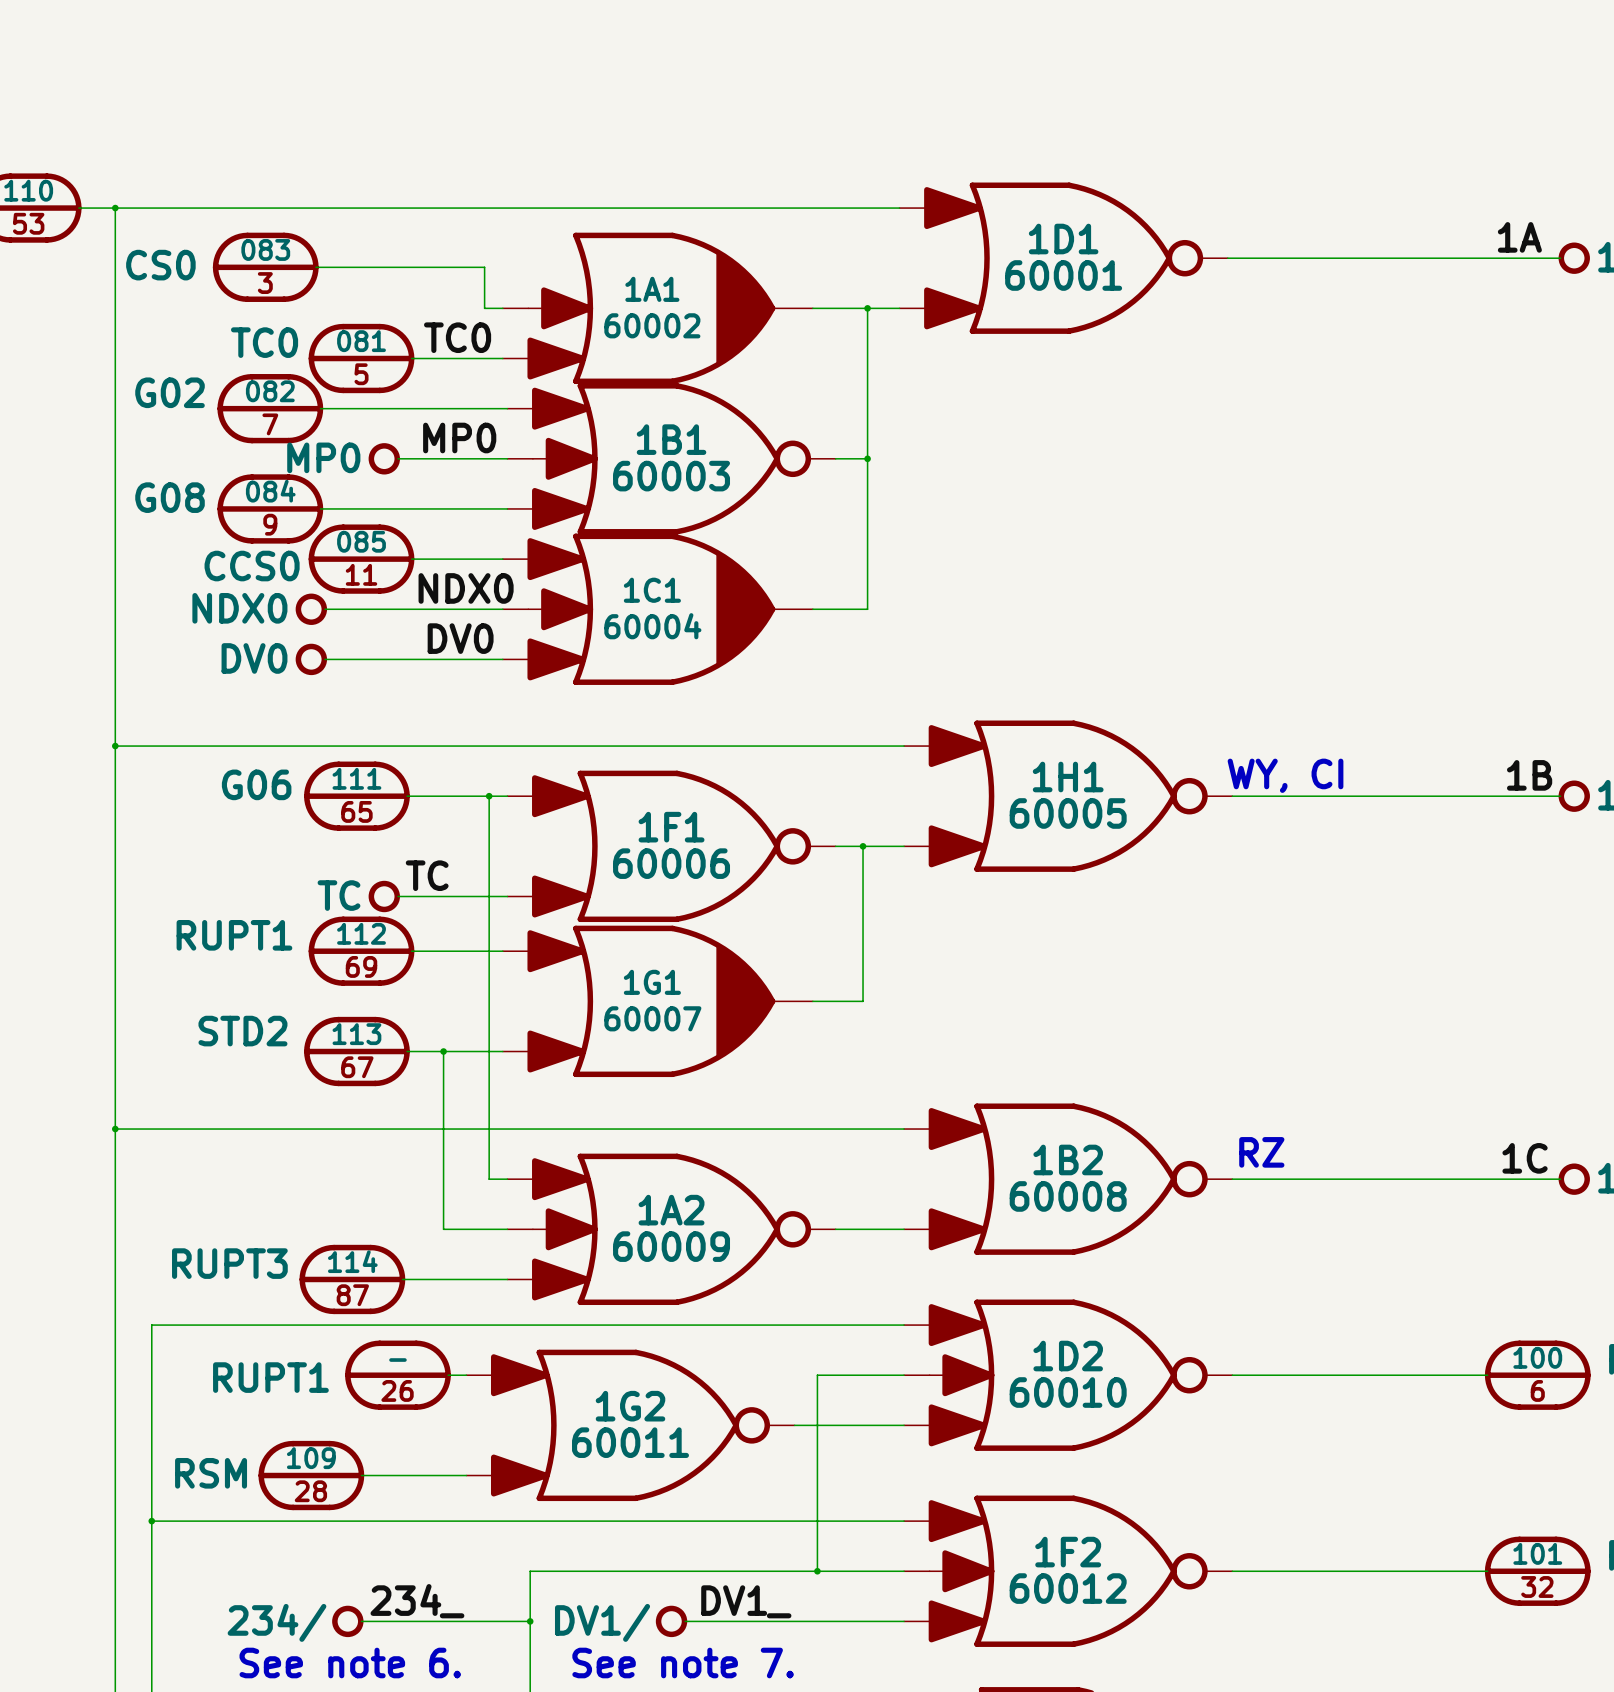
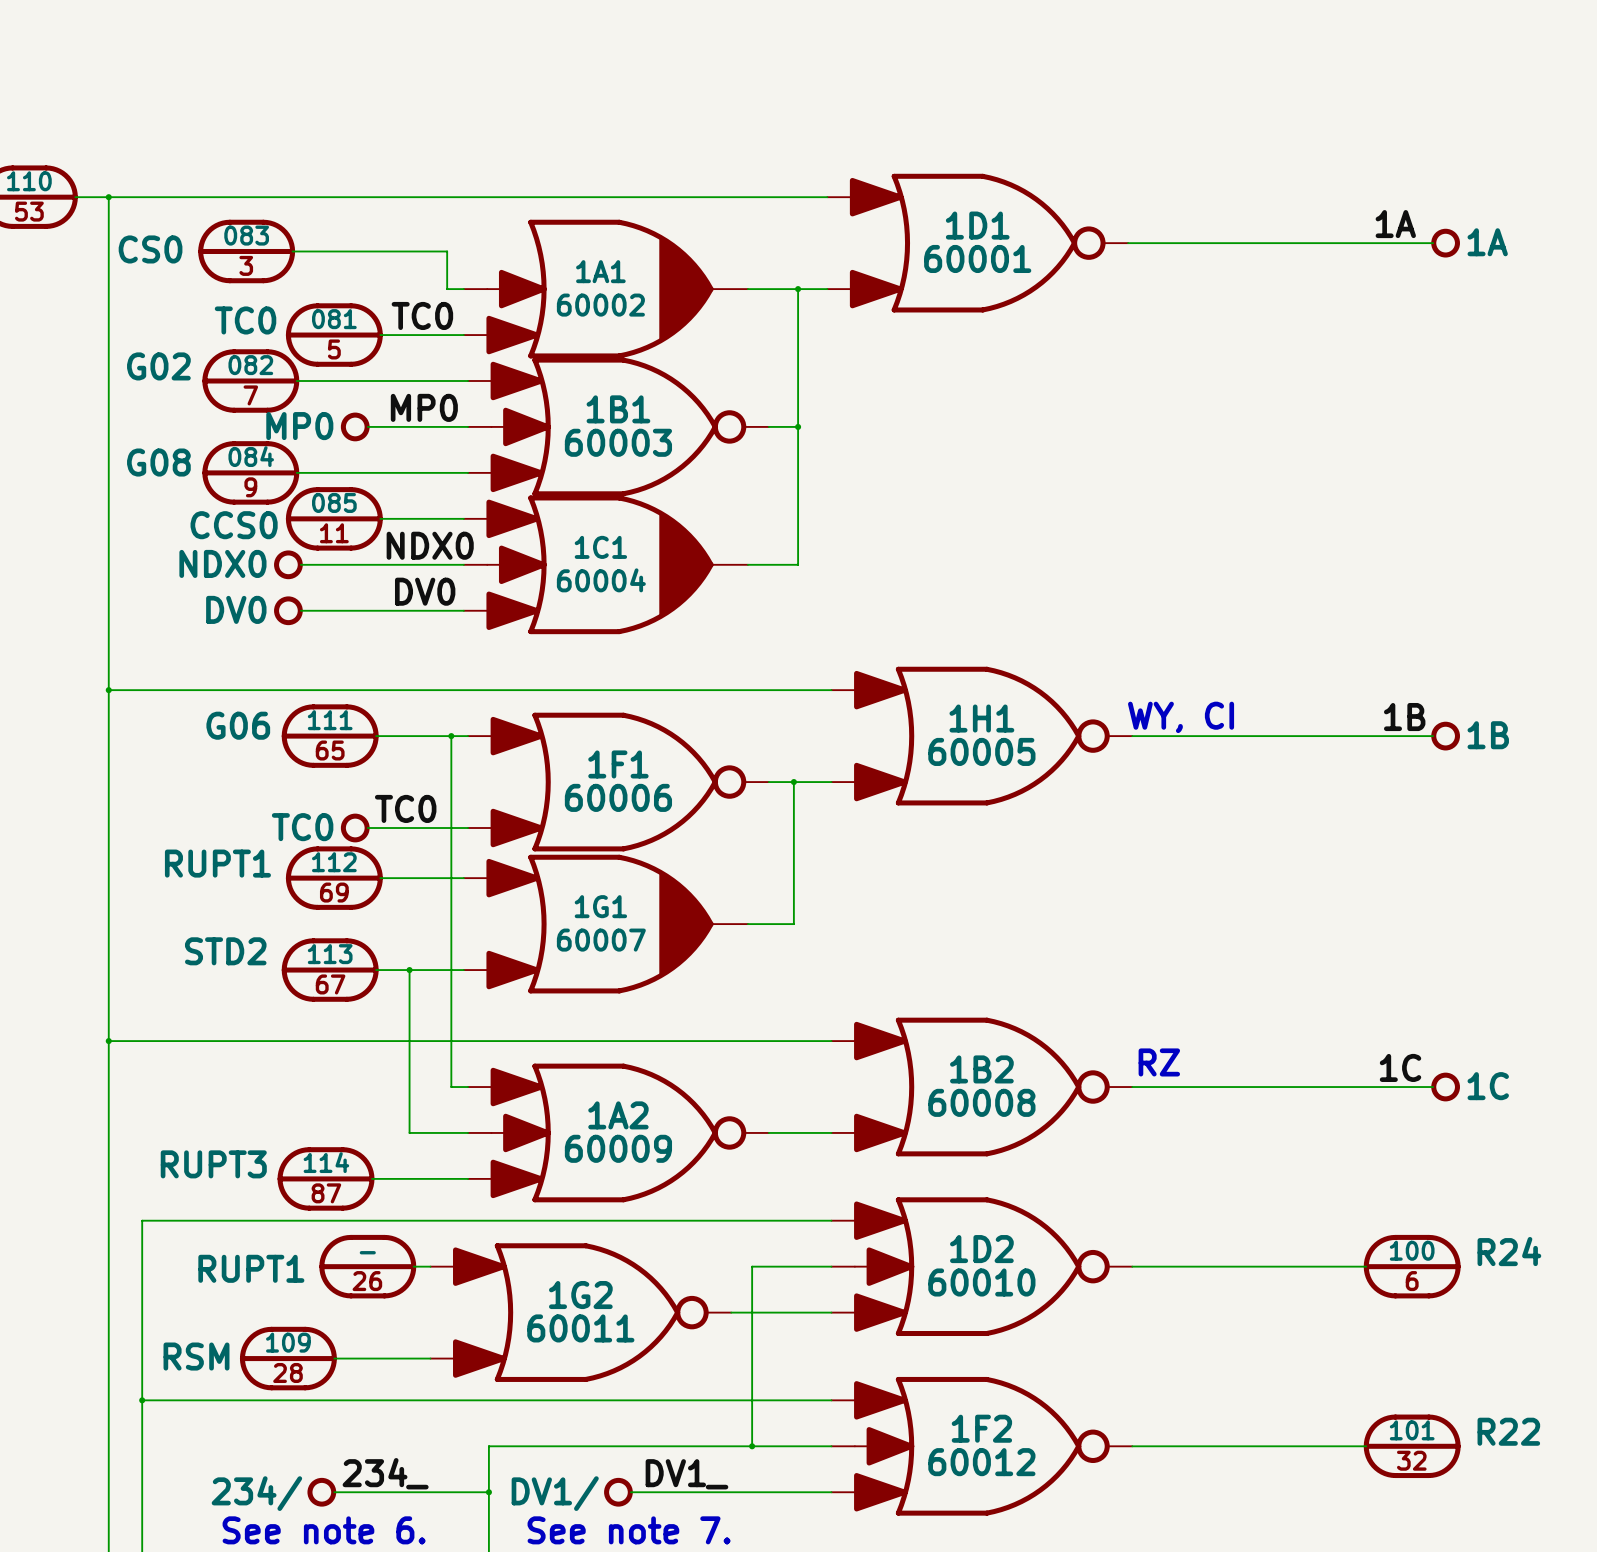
label: TC (427, 875) -> TC0 (405, 808)
part text: TC (338, 895) -> TC0 (302, 827)

